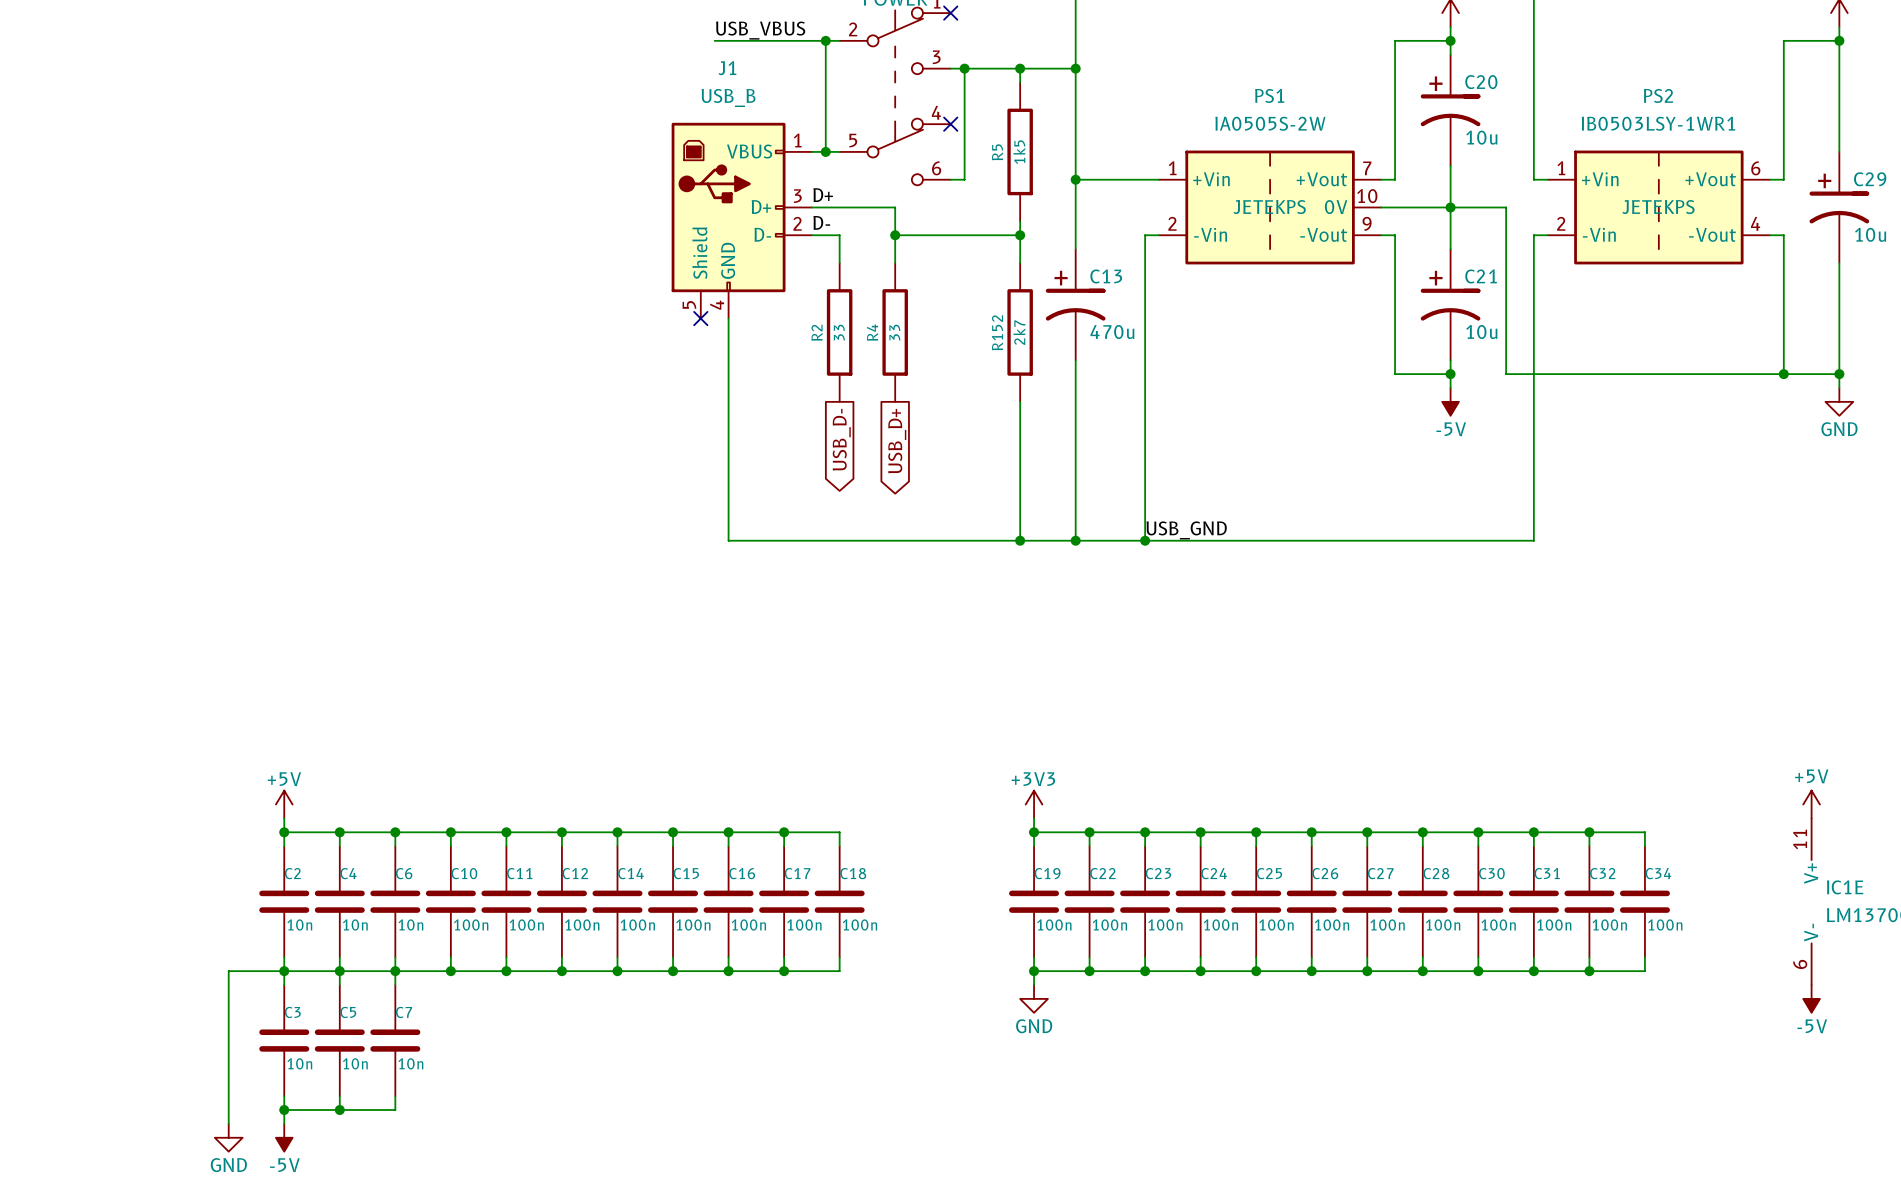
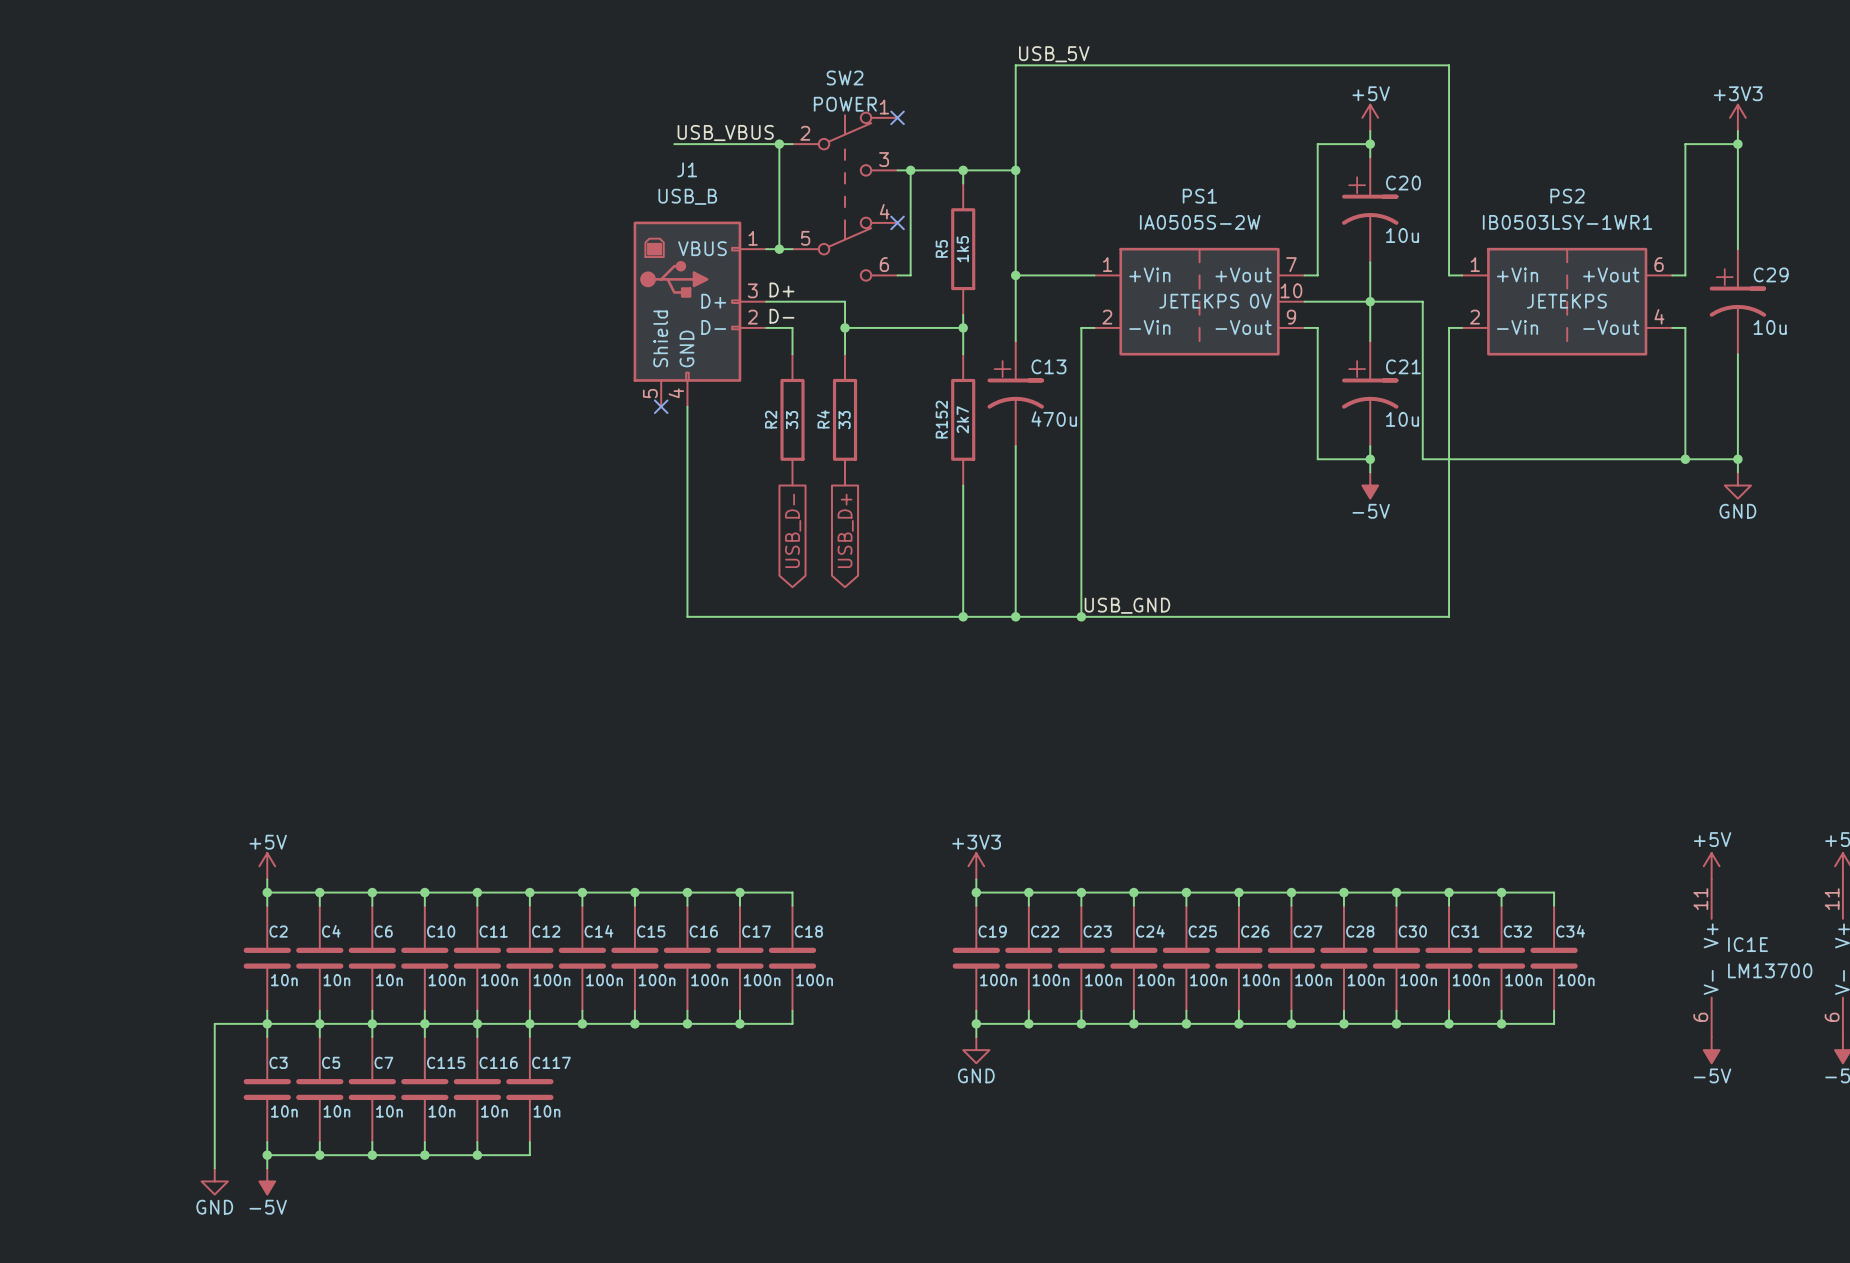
wire: none -> (424, 1023) (424, 1037)
wire: none -> (477, 1023) (477, 1037)
wire: none -> (529, 1023) (529, 1037)
C115: none -> 10n (424, 1089)
C116: none -> 10n (477, 1089)
C117: none -> 10n (529, 1089)
wire: none -> (424, 1142) (424, 1155)
wire: none -> (477, 1142) (477, 1155)
wire: none -> (529, 1142) (529, 1155) (372, 1155)
junction: none -> (372, 1155)
junction: none -> (424, 1155)
junction: none -> (477, 1155)

